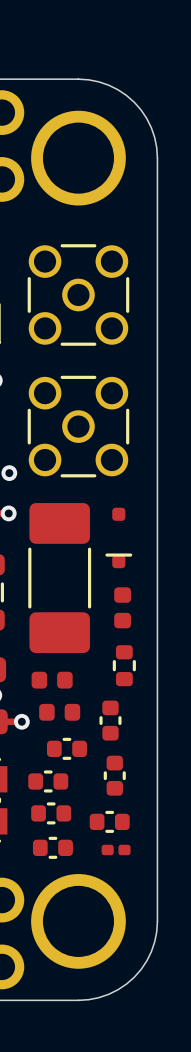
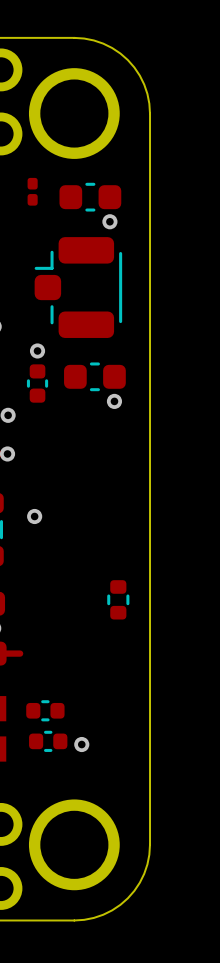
part: none -> (32, 191)
part: none -> (90, 197)
via: none -> (109, 221)
part: (78, 294) -> none
part: none -> (78, 287)
via: none -> (37, 350)
part: (78, 426) -> none
part: none -> (94, 376)
part: none -> (37, 383)
via: none -> (114, 401)
part: (118, 537) -> none
via: none -> (34, 516)
part: (59, 578) -> none
part: (122, 607) -> none
part: (52, 680) -> none
part: (59, 712) -> none
part: (110, 720) -> none
via: (21, 721) -> none
part: (66, 748) -> none
part: (114, 775) -> none
via: none -> (81, 744)
part: (109, 821) -> none
part: (52, 847) -> none
part: (116, 849) -> none

